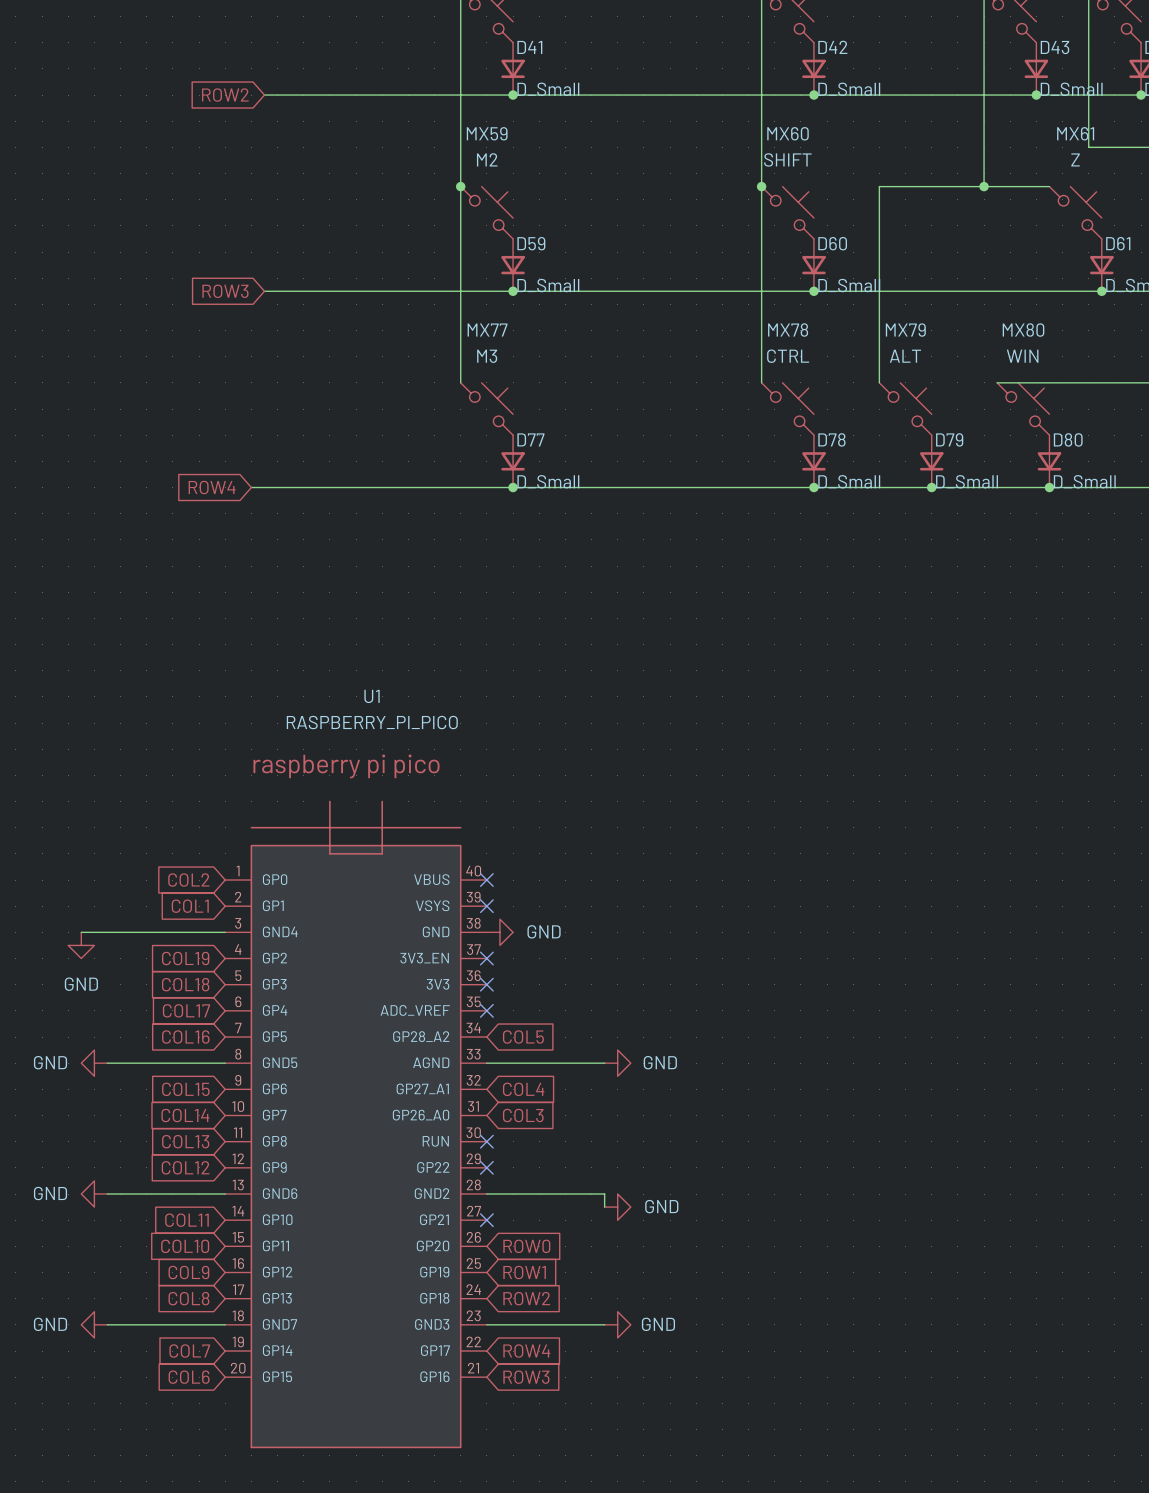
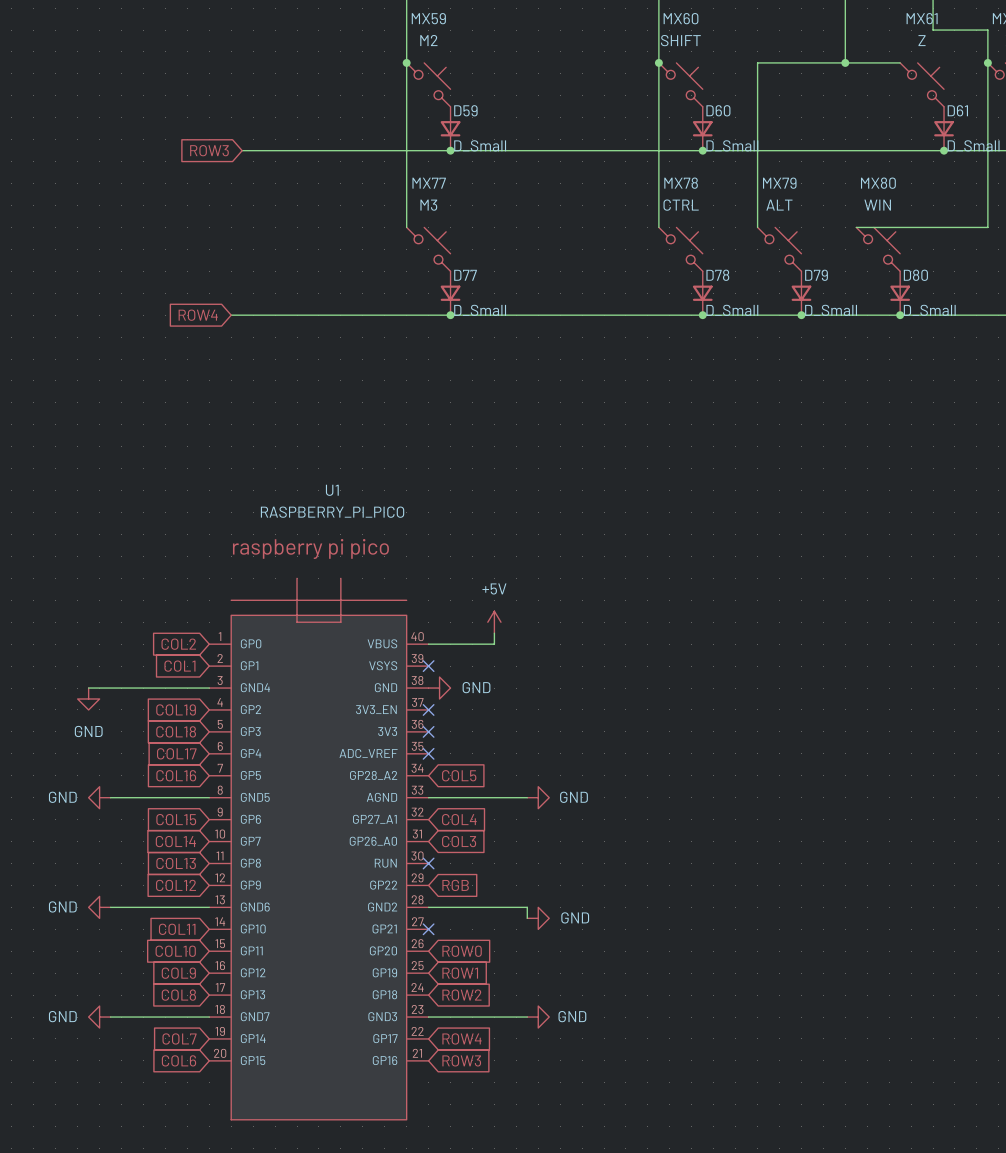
power symbol: none -> +5V (494, 622)
wire: none -> (494, 633) (494, 644) (428, 644)
no-connect mark: (486, 880) -> none
no-connect mark: (486, 1167) -> none
global label: none -> RGB (455, 885)

